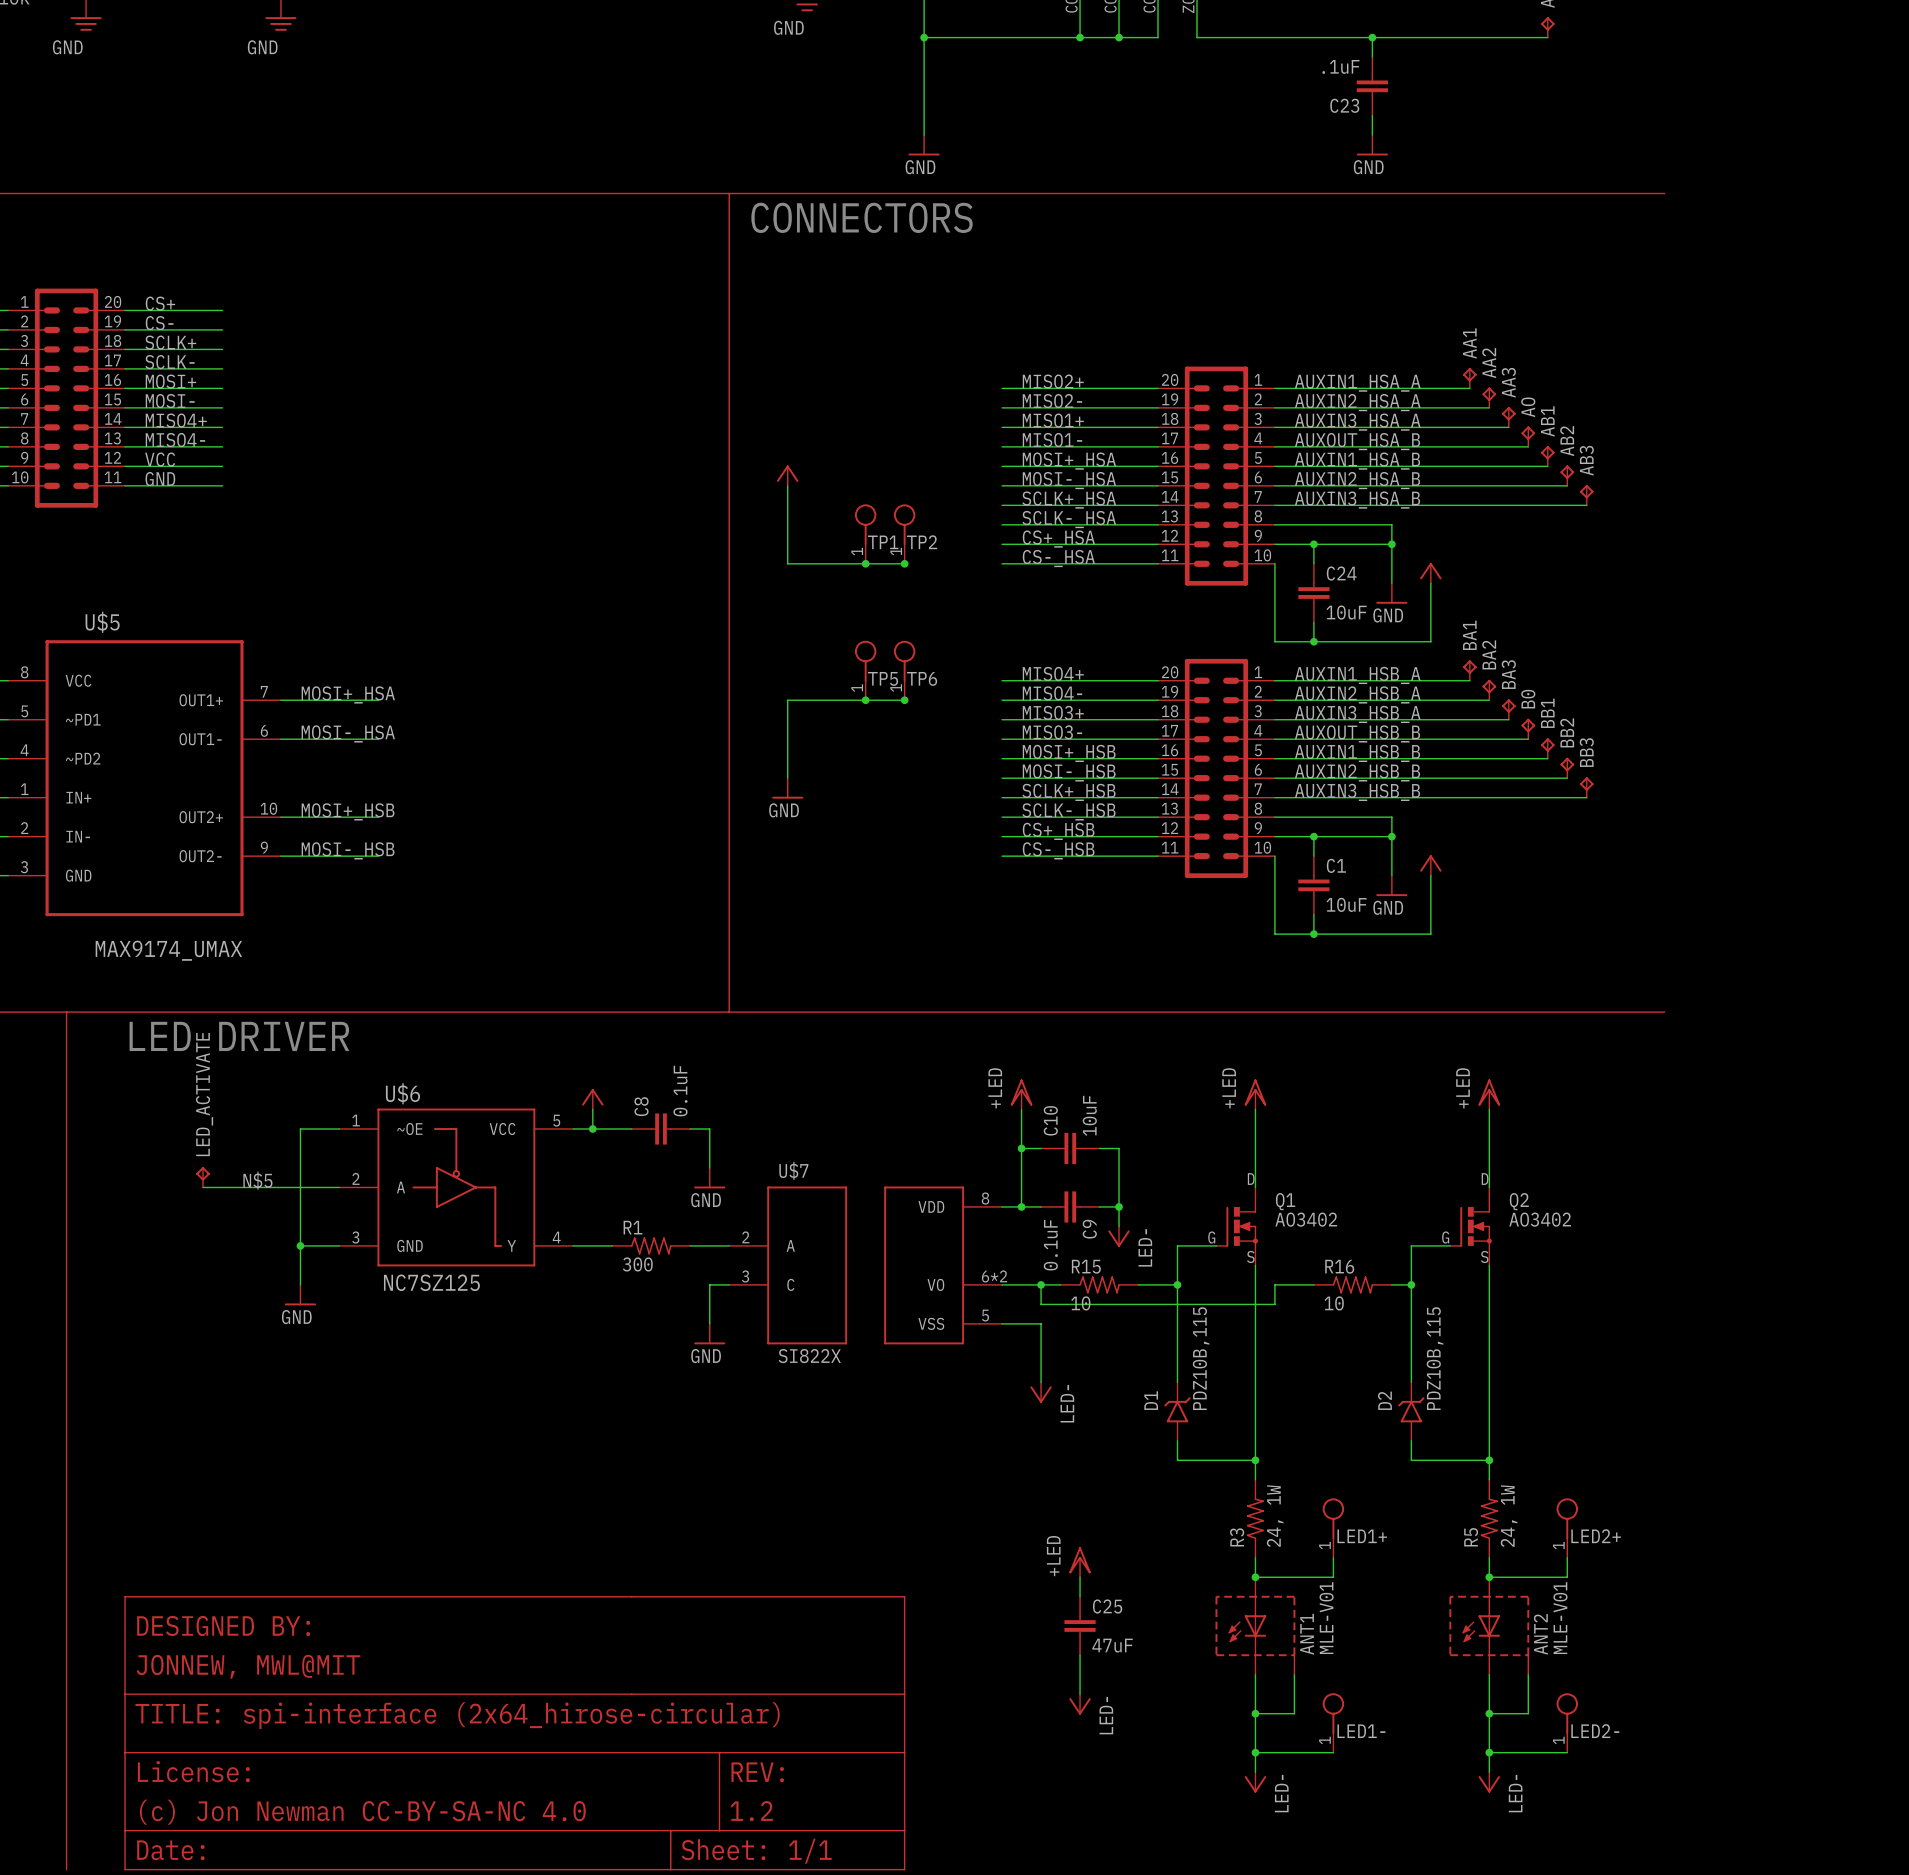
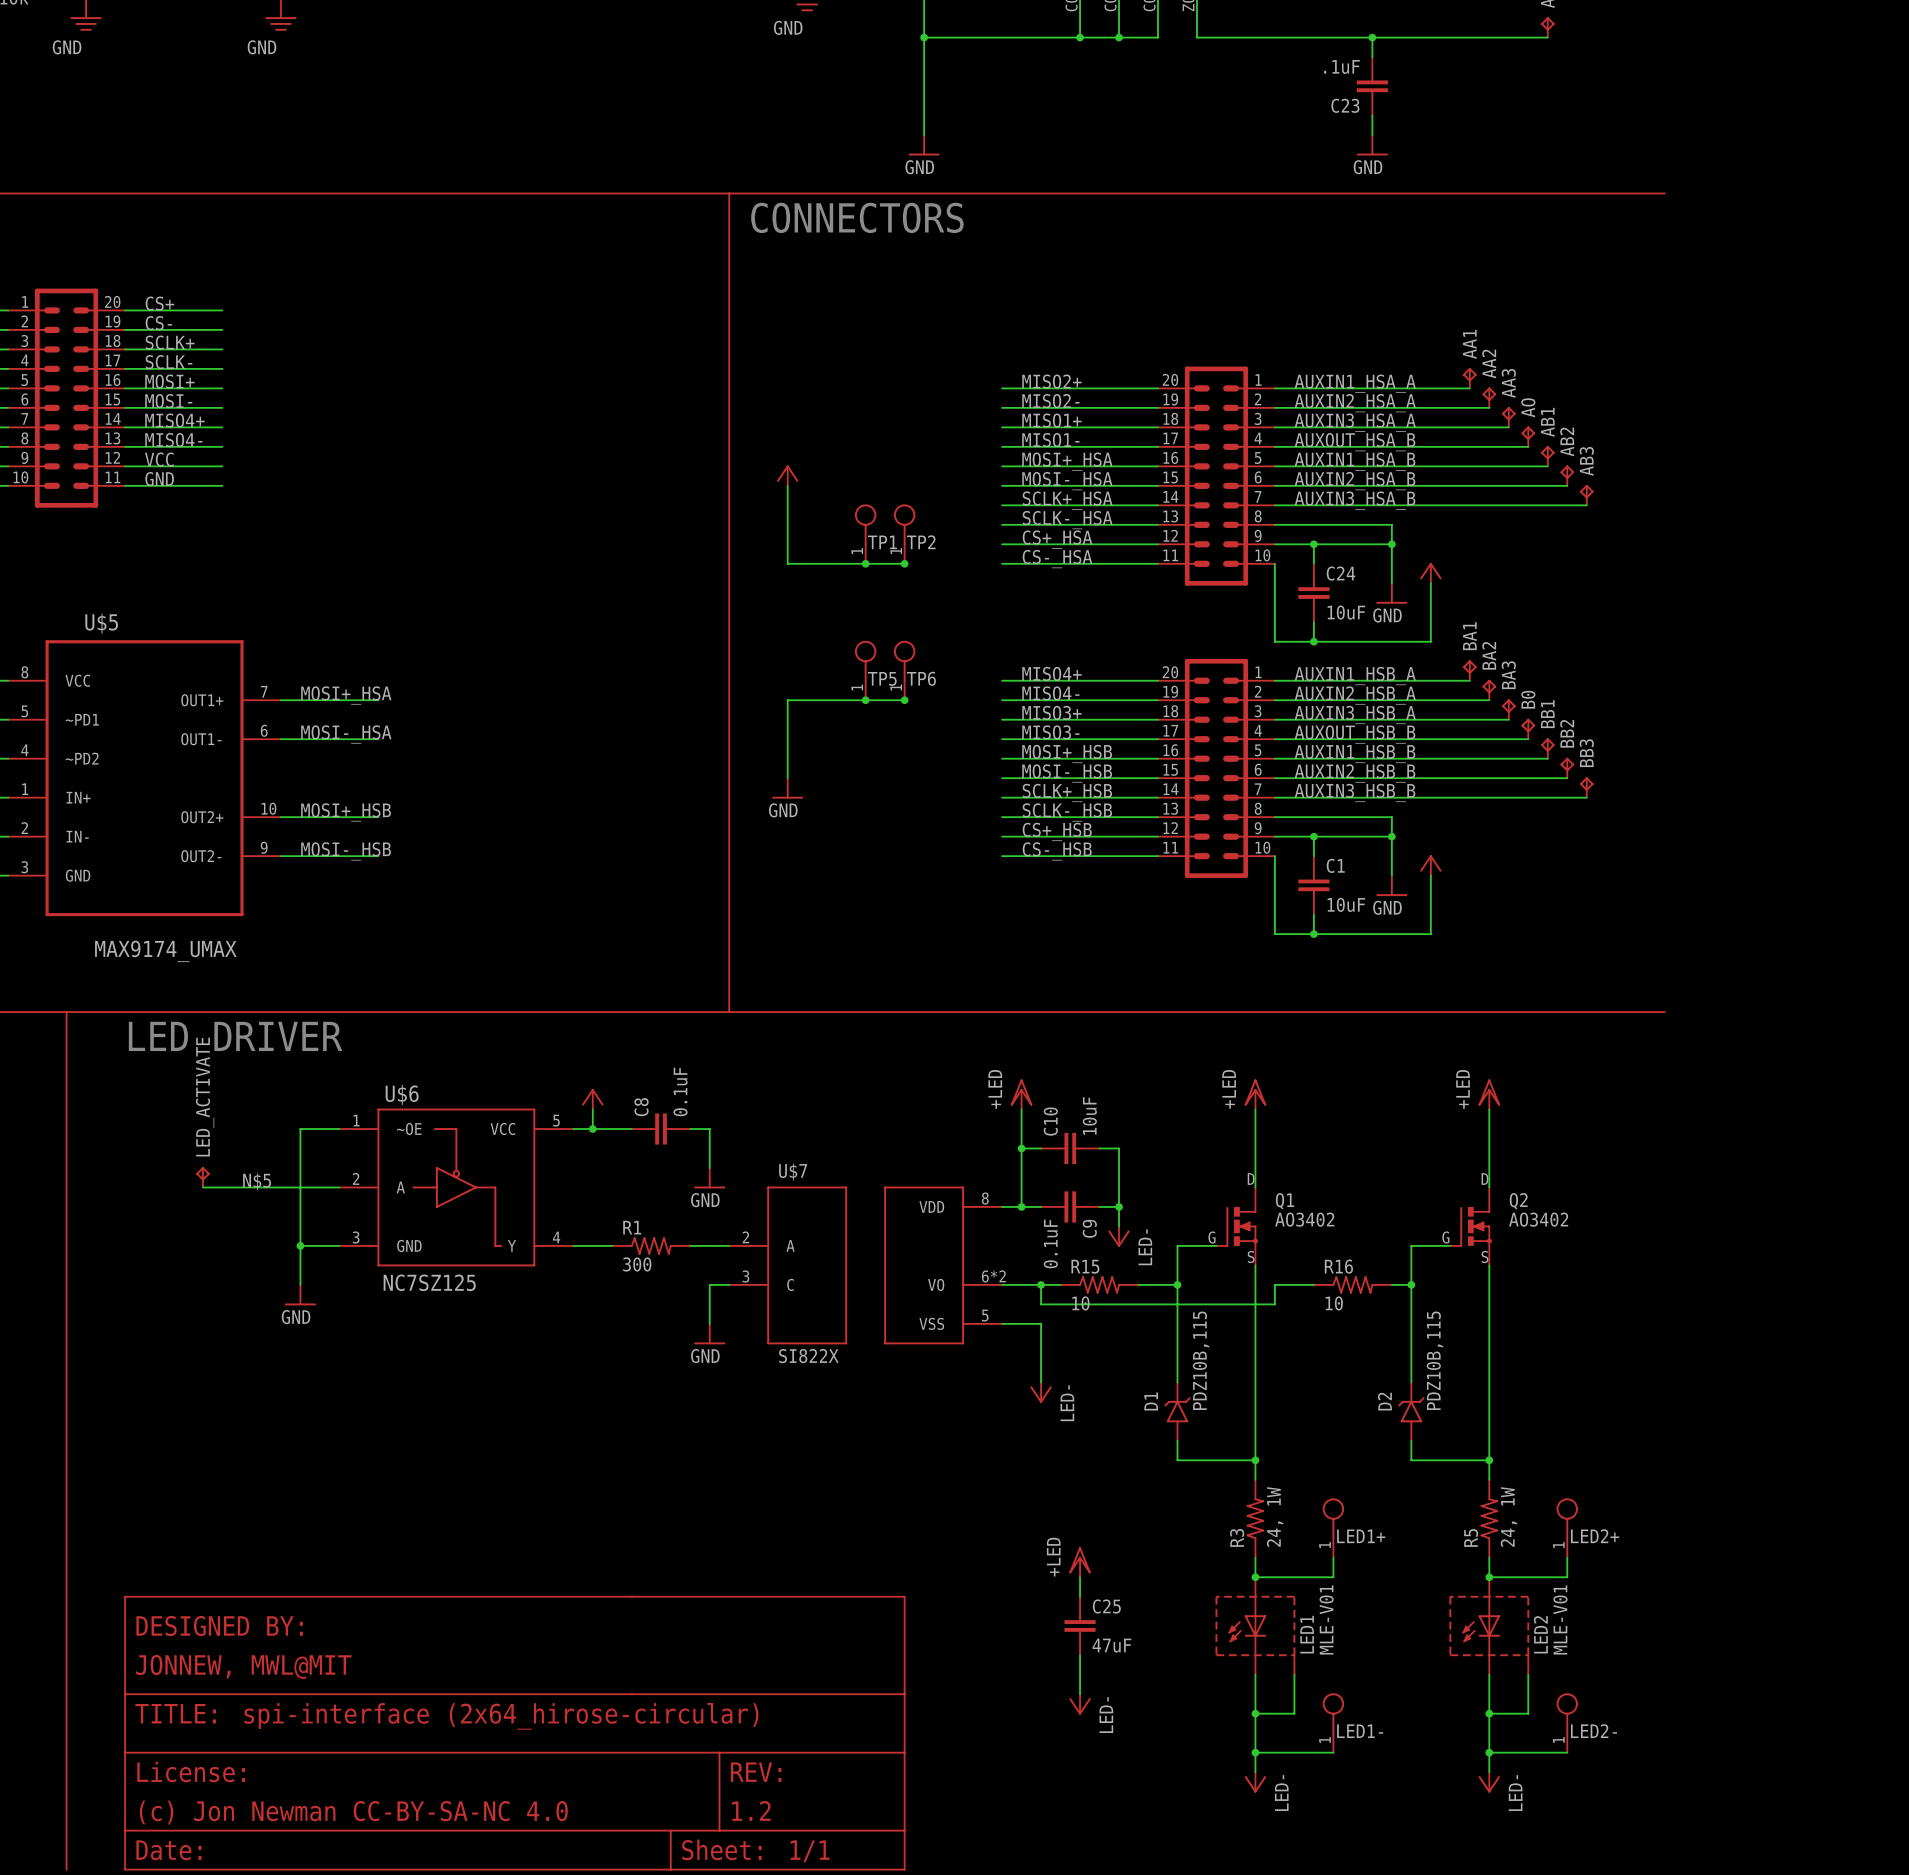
ANT1 name: ANT1 (1307, 1634) -> LED1 (1307, 1634)
ANT2 name: ANT2 (1540, 1634) -> LED2 (1540, 1634)

